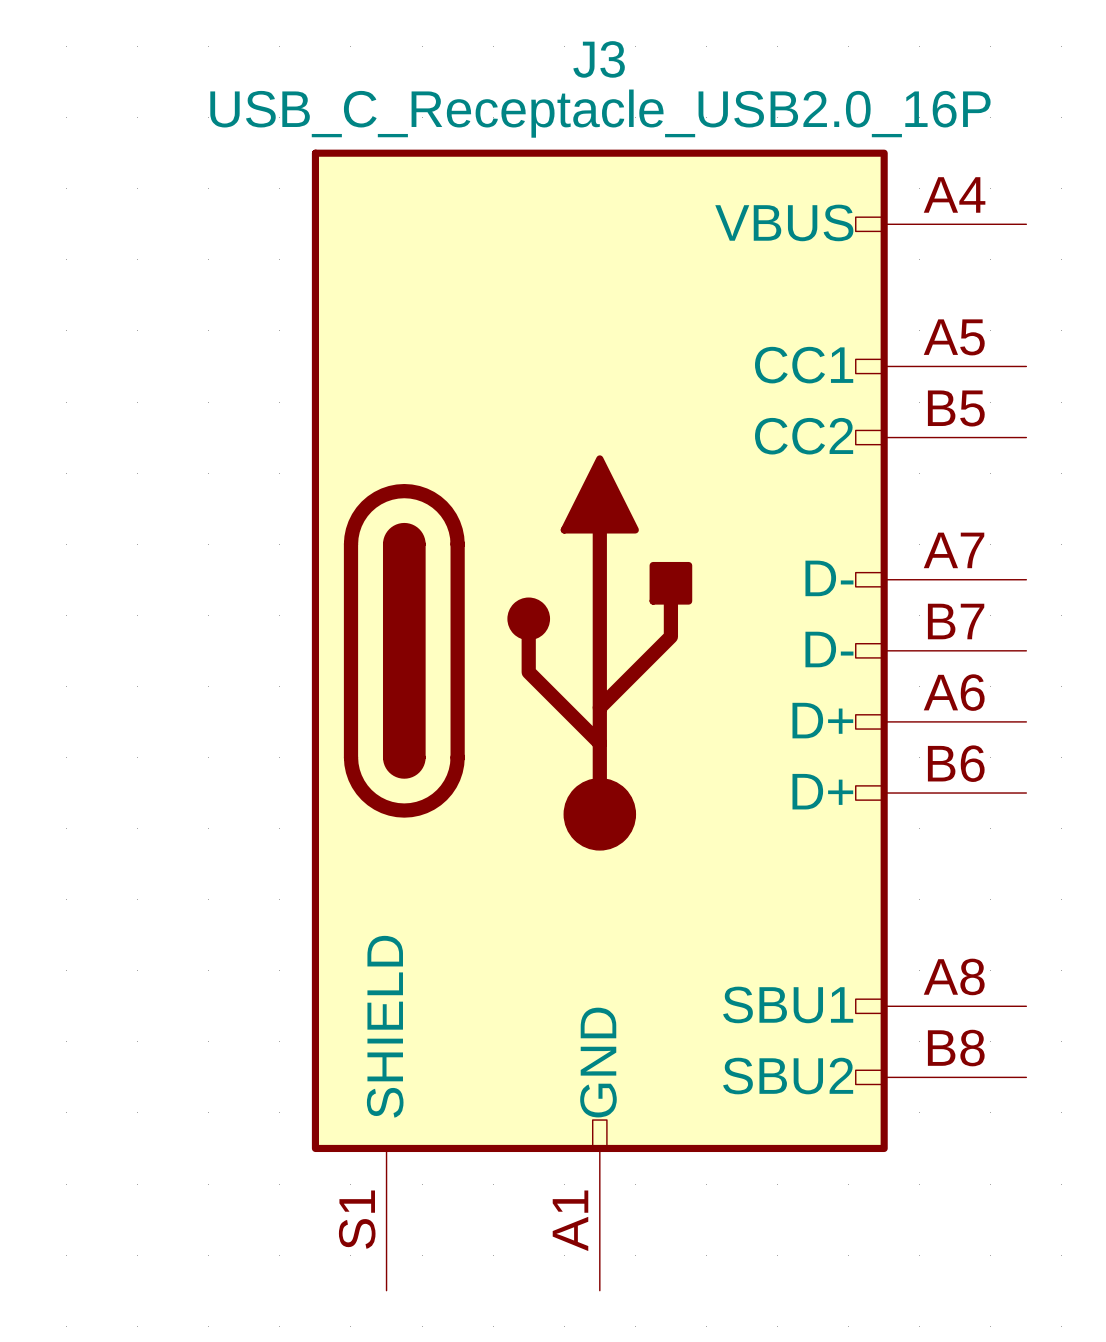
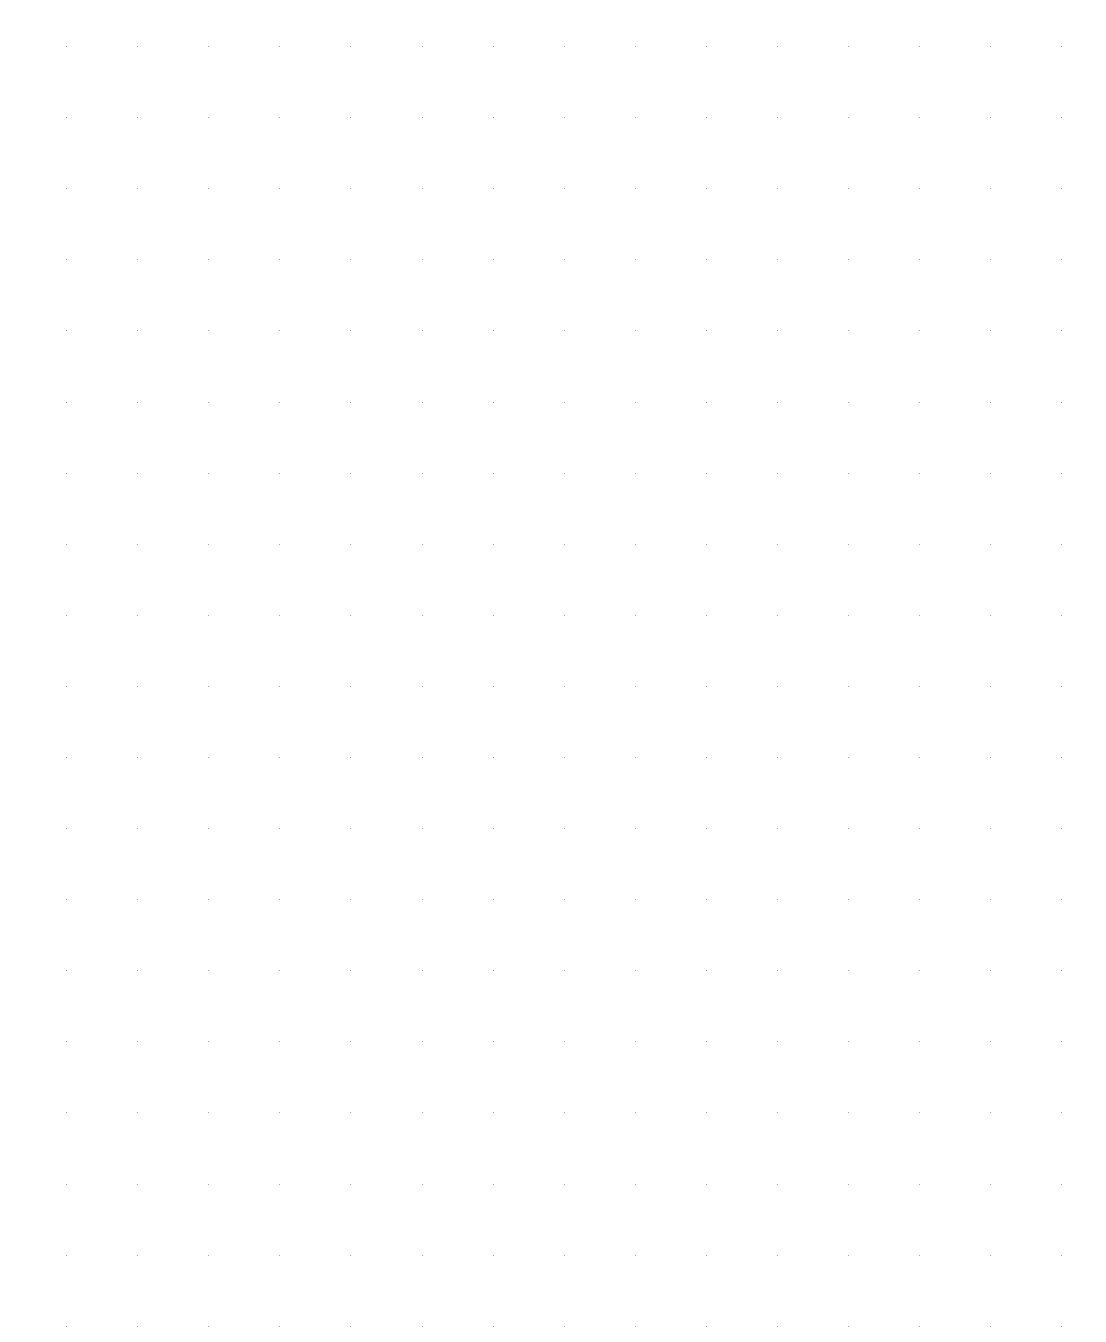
J3: USB_C_Receptacle_USB2.0_16P (669, 720) -> none

